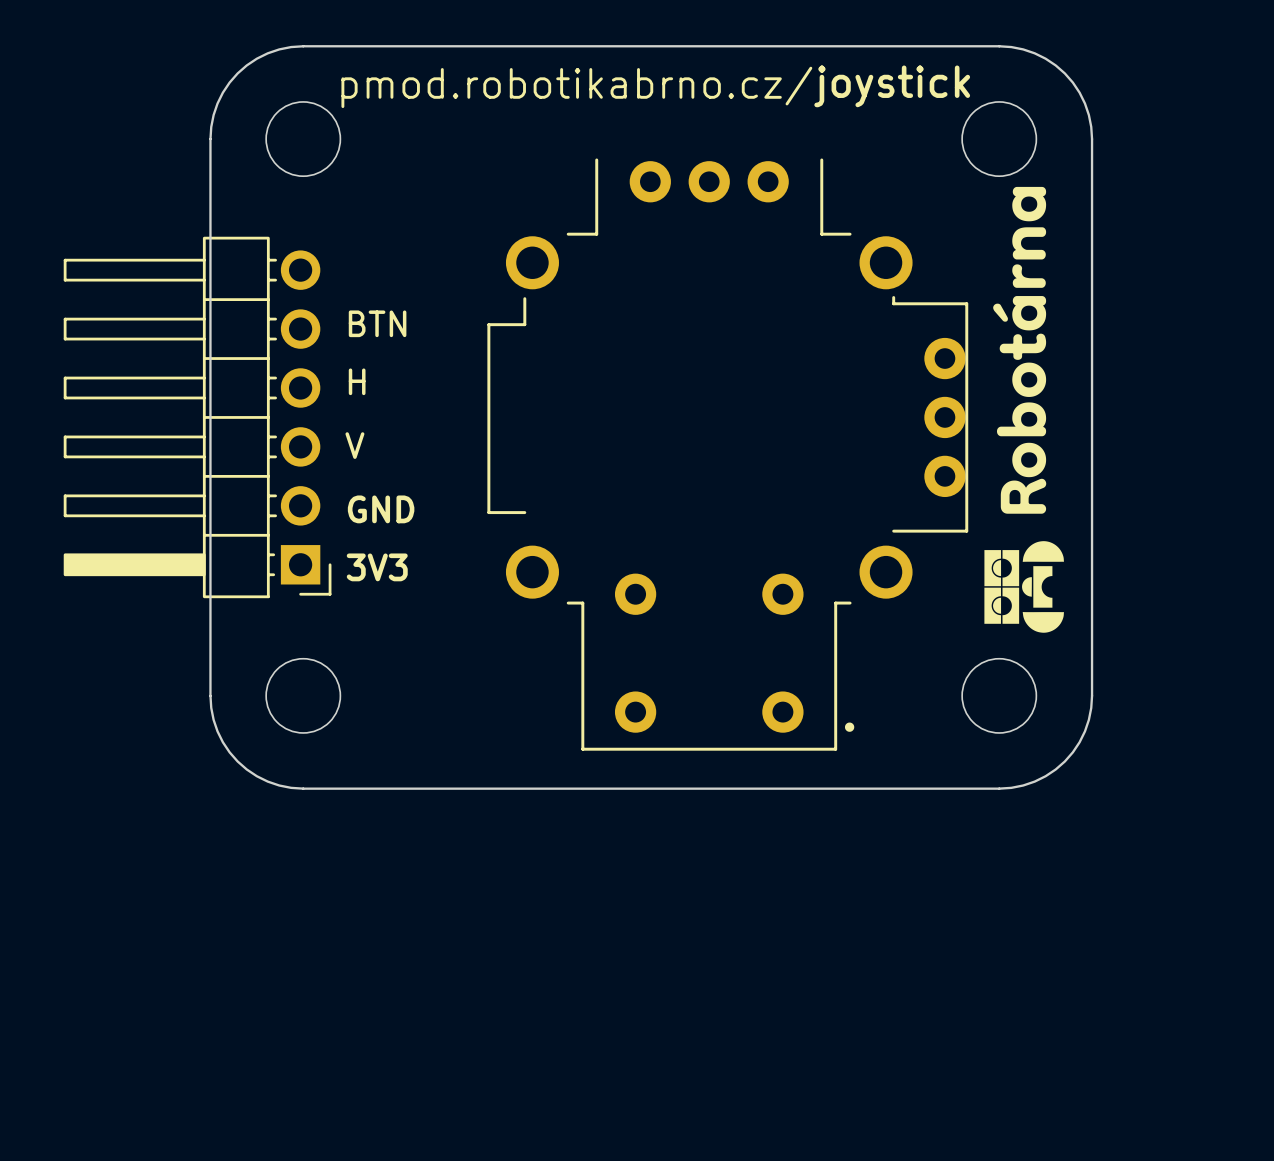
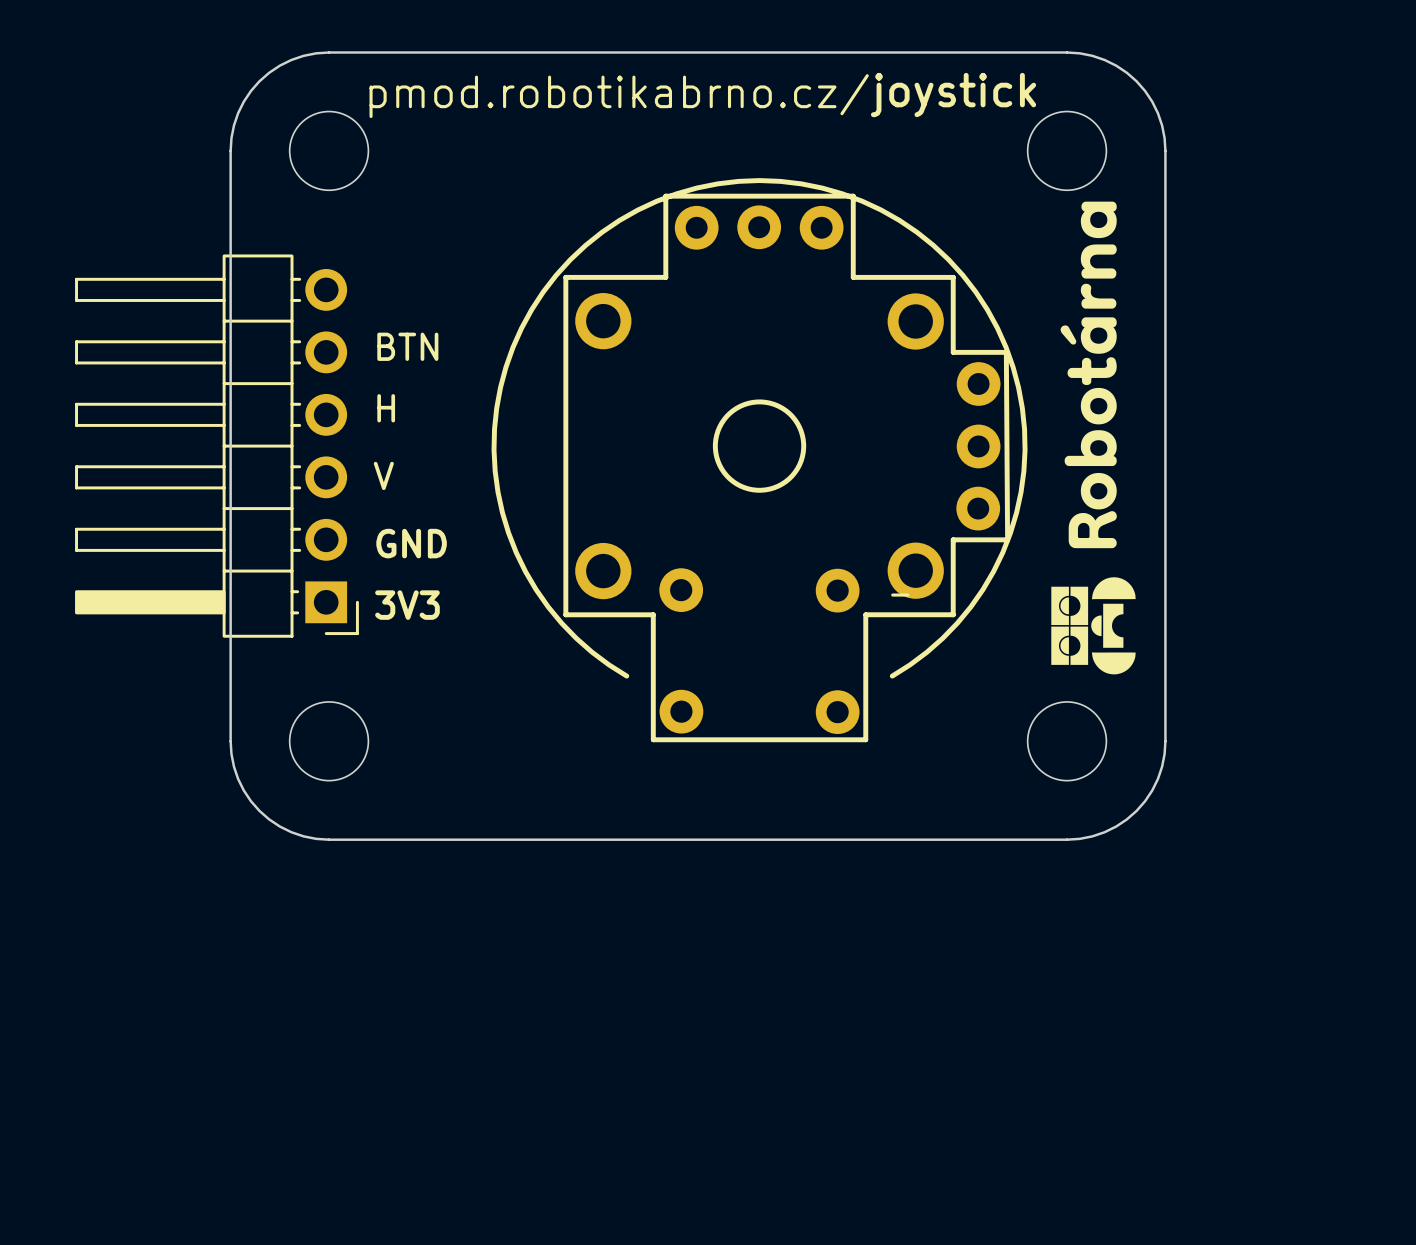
part: none -> (759, 460)
part: (727, 454) -> none

